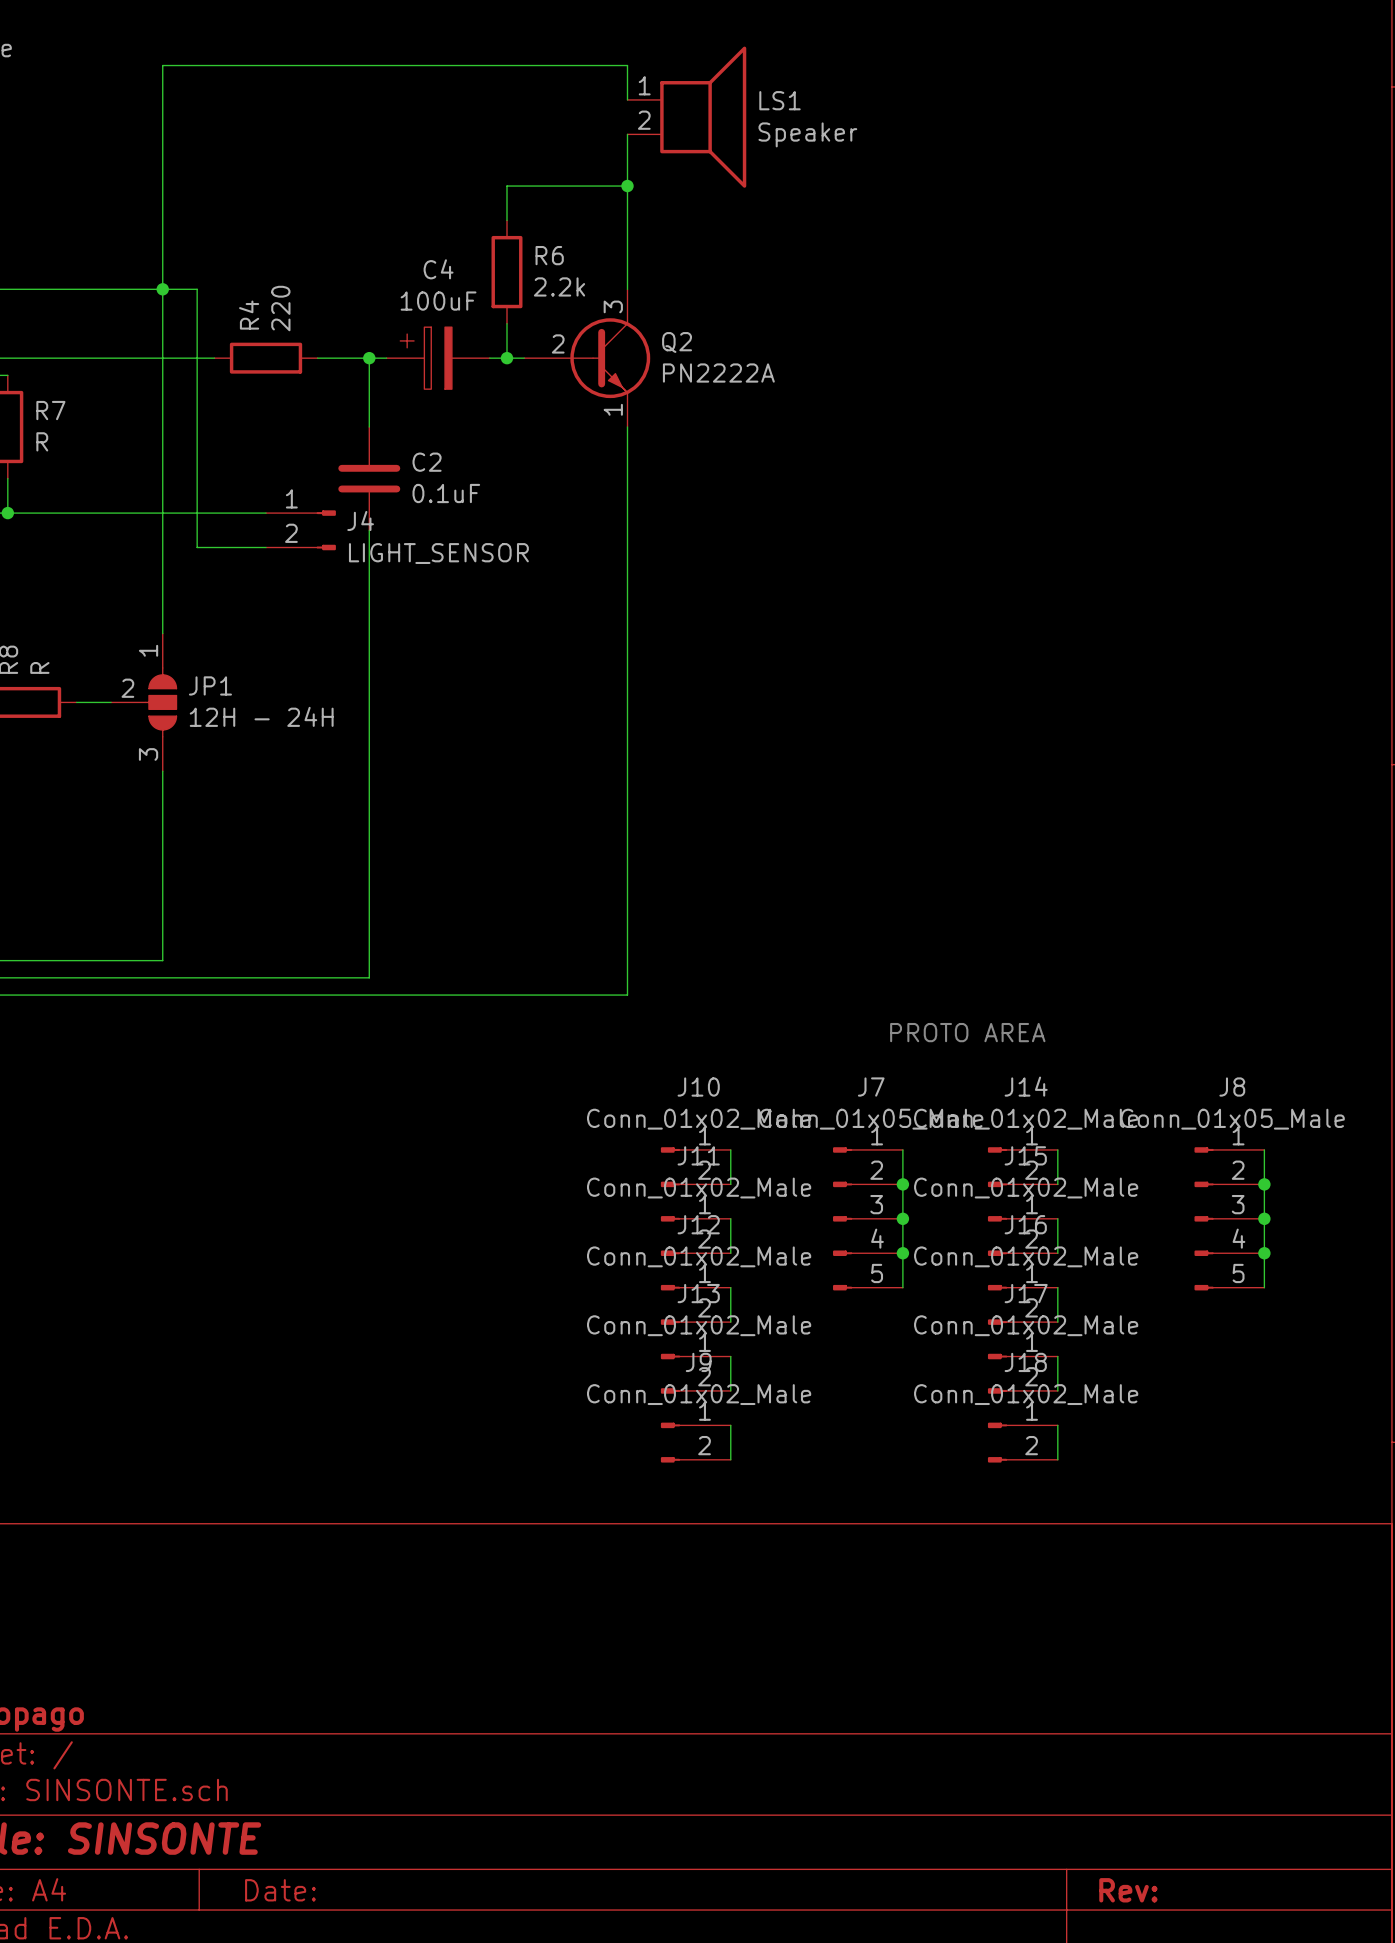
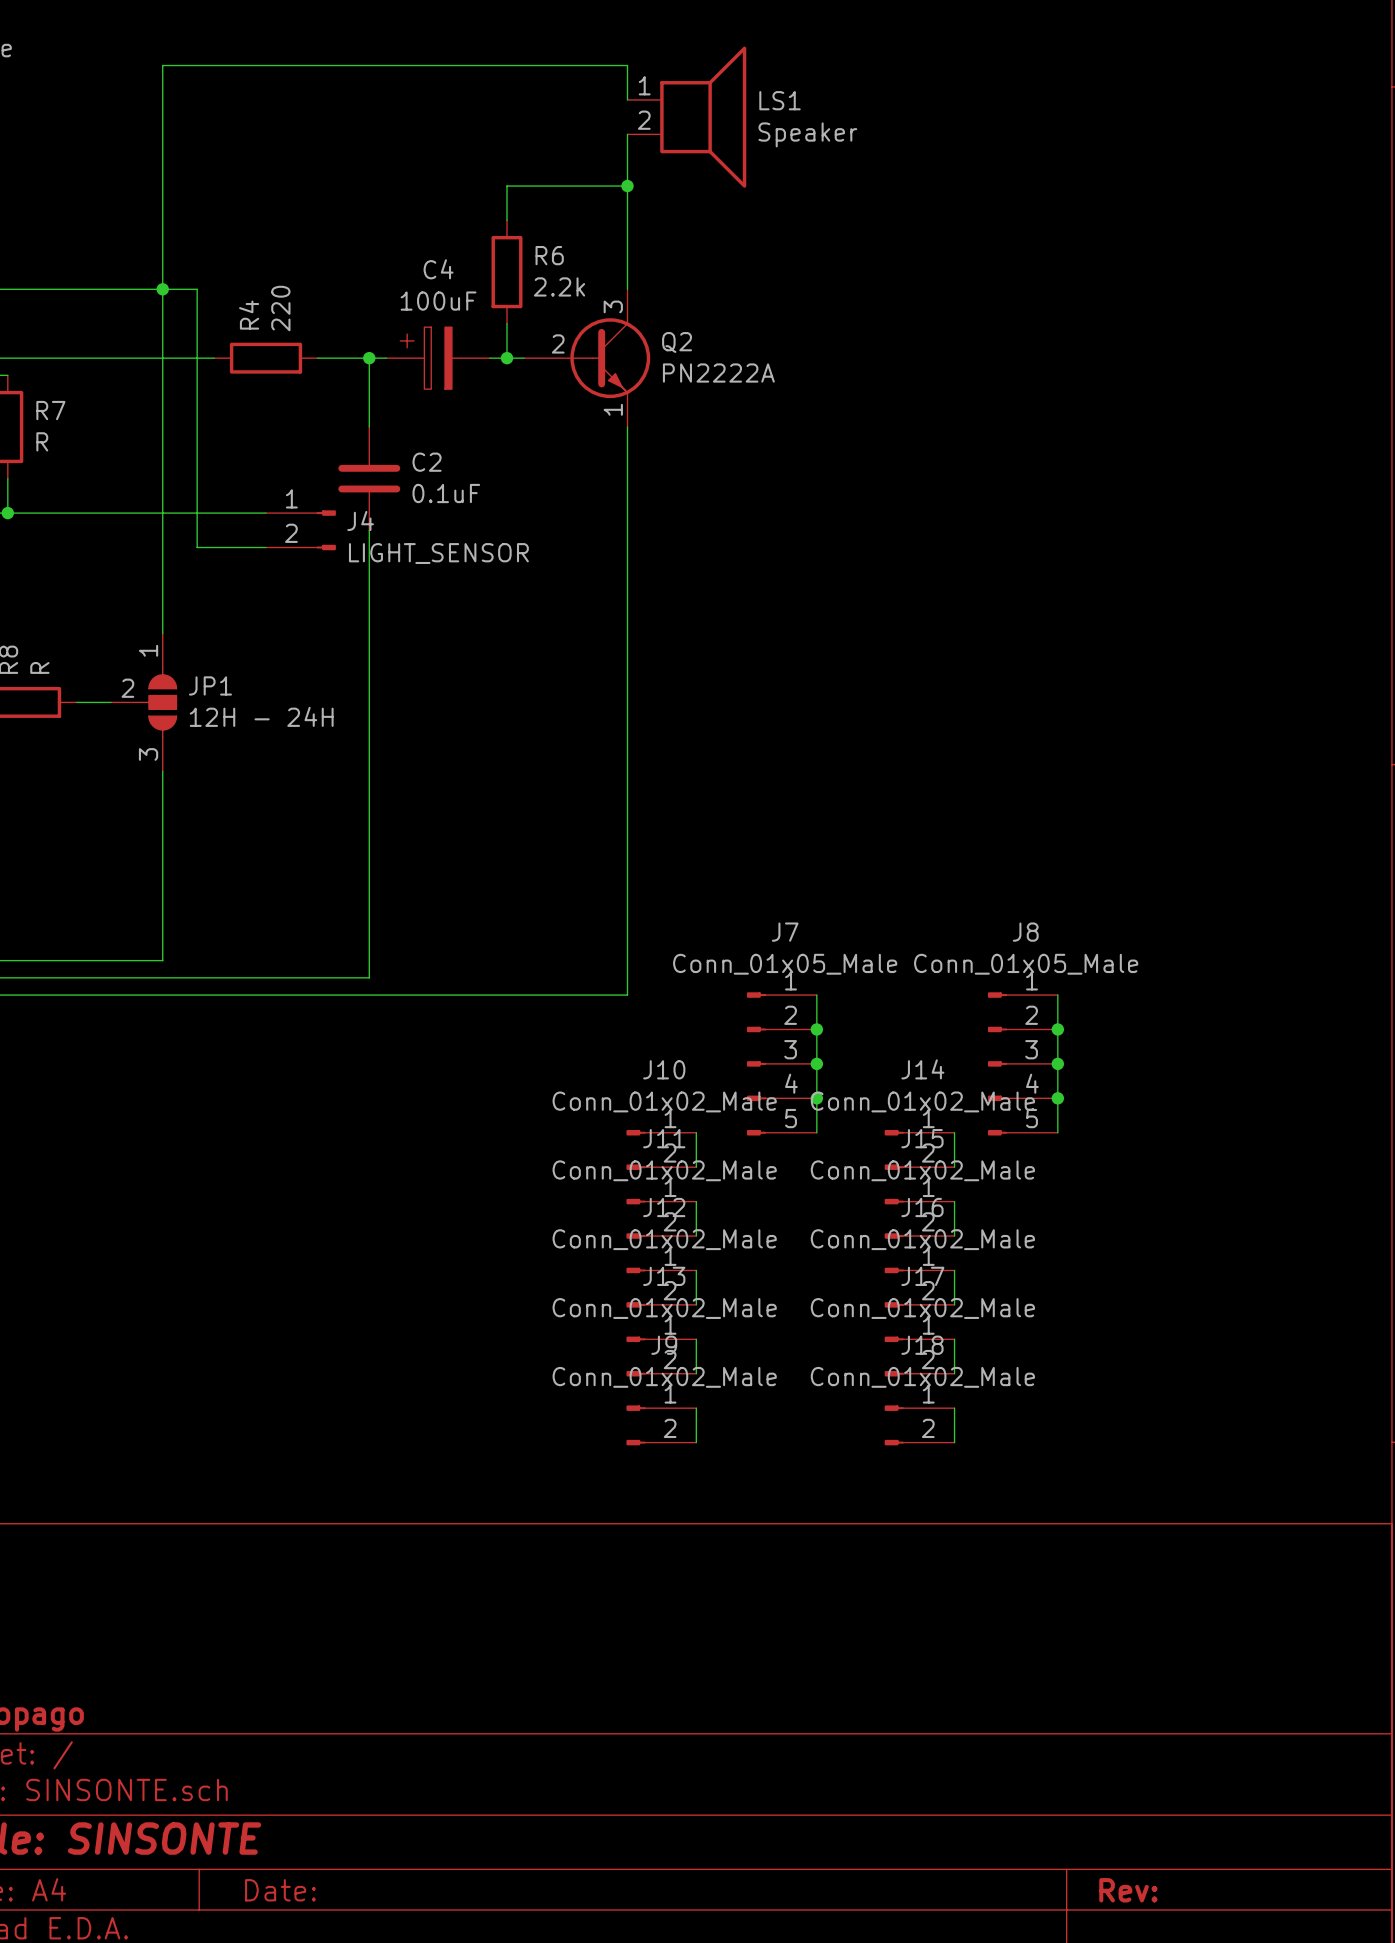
junction: none -> (816, 1029)
junction: none -> (1057, 1029)
text: PROTO AREA (967, 1032) -> none
junction: none -> (816, 1063)
junction: none -> (1057, 1063)
junction: none -> (816, 1098)
junction: none -> (1057, 1098)
wire: (730, 1149) (730, 1184) -> (696, 1132) (696, 1167)
wire: (902, 1149) (902, 1287) -> (816, 995) (816, 1132)
wire: (1057, 1149) (1057, 1184) -> (954, 1132) (954, 1167)
wire: (1264, 1149) (1264, 1287) -> (1057, 995) (1057, 1132)
J10 position: (695, 1167) -> (661, 1149)
J14 position: (1022, 1167) -> (919, 1149)
junction: (902, 1184) -> none
junction: (1264, 1184) -> none
wire: (730, 1218) (730, 1253) -> (696, 1201) (696, 1236)
J7 position: (867, 1218) -> (781, 1063)
junction: (902, 1218) -> none
wire: (1057, 1218) (1057, 1253) -> (954, 1201) (954, 1236)
J8 position: (1229, 1218) -> (1022, 1063)
junction: (1264, 1218) -> none
J11 position: (695, 1236) -> (661, 1218)
J15 position: (1022, 1236) -> (919, 1218)
junction: (902, 1253) -> none
junction: (1264, 1253) -> none
wire: (730, 1287) (730, 1322) -> (696, 1270) (696, 1304)
wire: (1057, 1287) (1057, 1322) -> (954, 1270) (954, 1304)
J12 position: (695, 1304) -> (661, 1287)
J16 position: (1022, 1304) -> (919, 1287)
wire: (730, 1356) (730, 1390) -> (696, 1339) (696, 1373)
wire: (1057, 1356) (1057, 1390) -> (954, 1339) (954, 1373)
J13 position: (695, 1373) -> (661, 1356)
J17 position: (1022, 1373) -> (919, 1356)
wire: (730, 1425) (730, 1459) -> (696, 1408) (696, 1442)
wire: (1057, 1425) (1057, 1459) -> (954, 1408) (954, 1442)
J9 position: (695, 1442) -> (661, 1425)
J18 position: (1022, 1442) -> (919, 1425)

